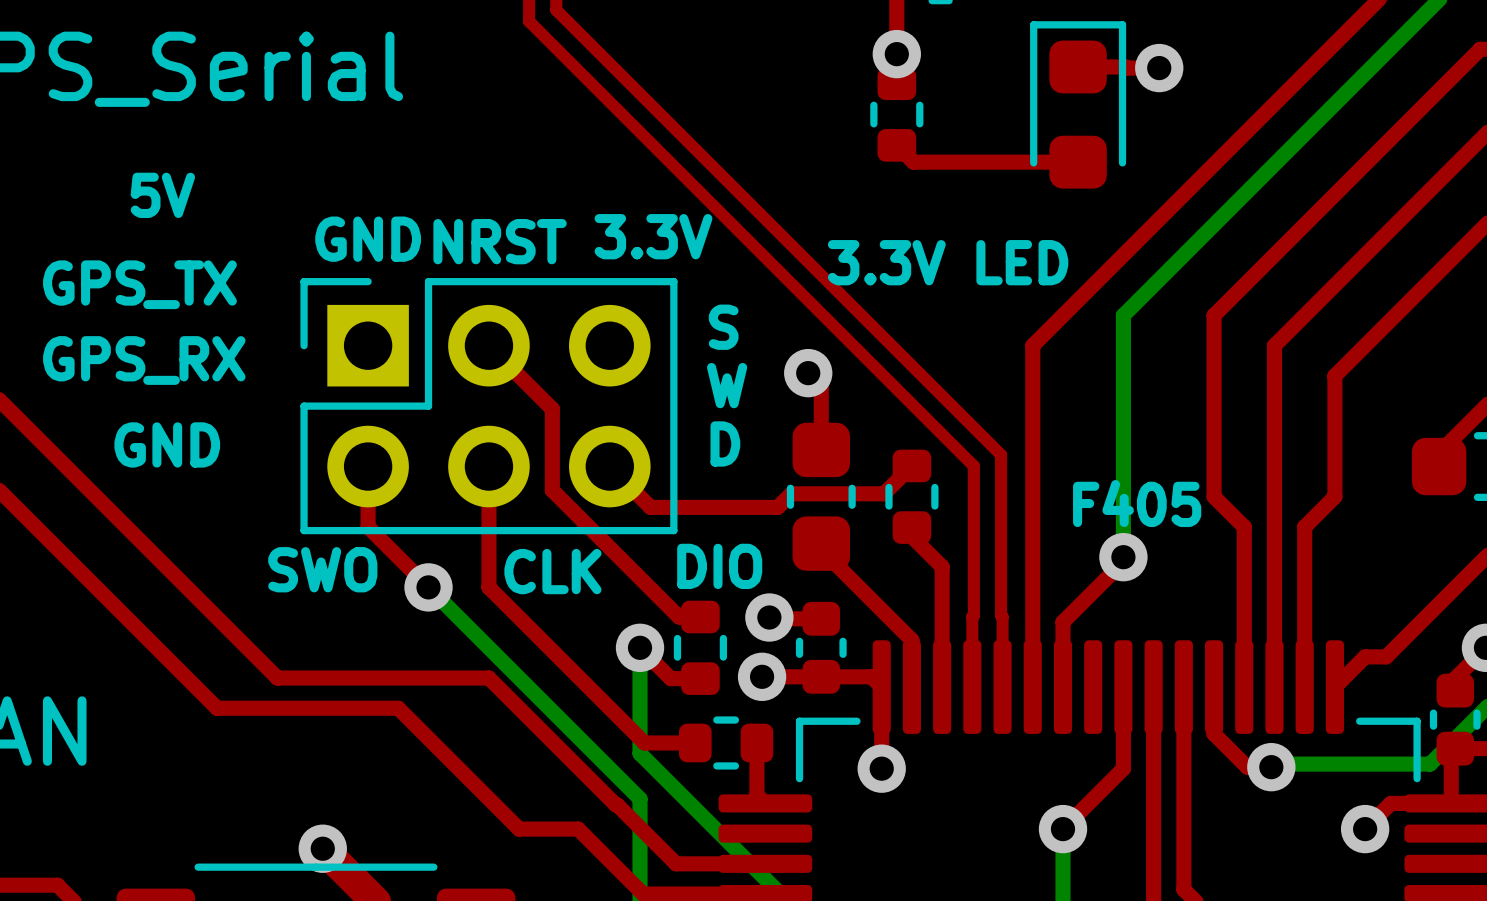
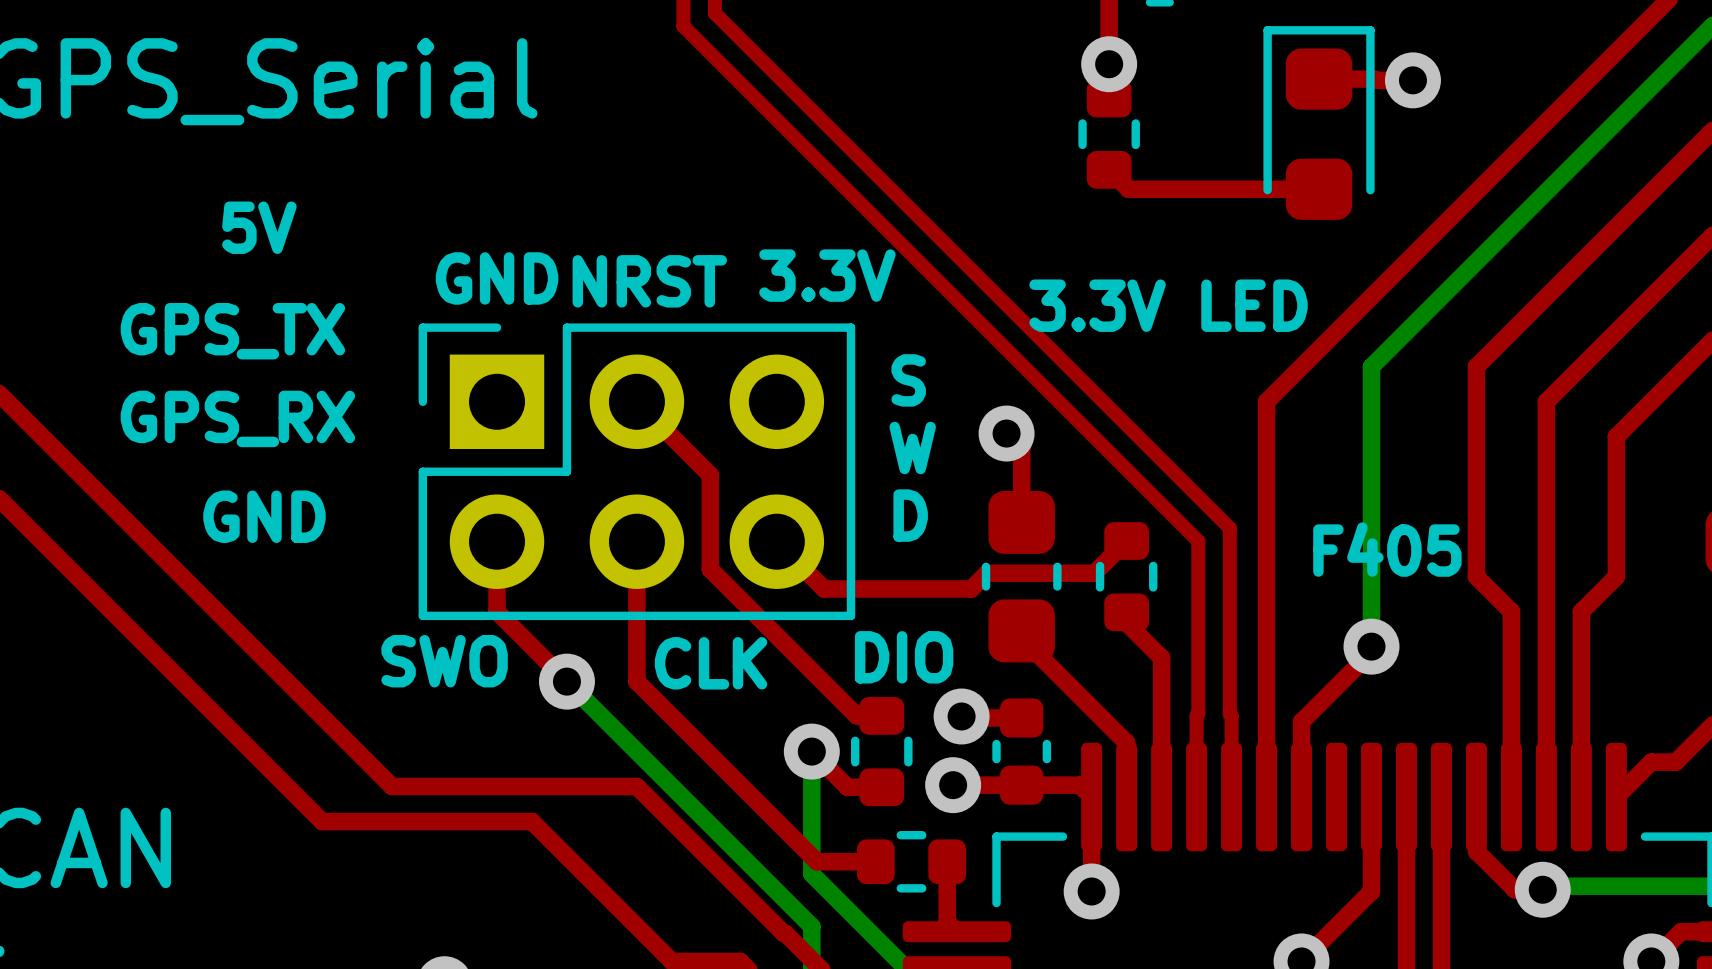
text position: F405 (1137, 503) -> F405 (1387, 549)

